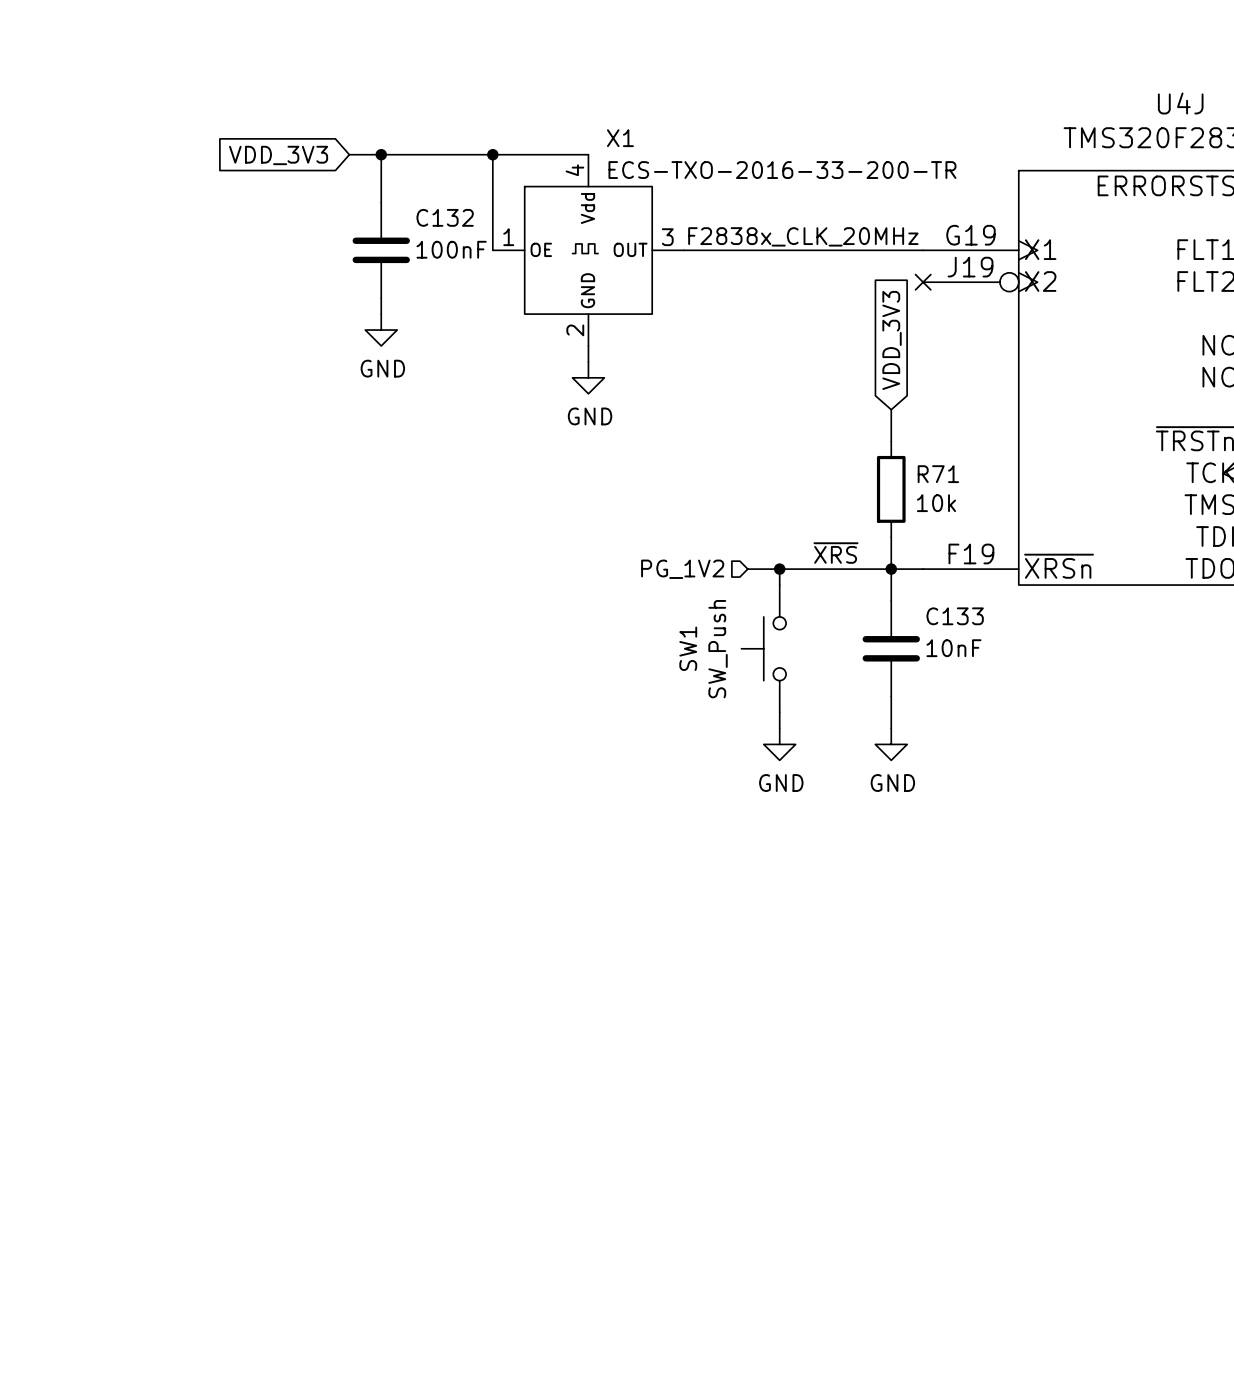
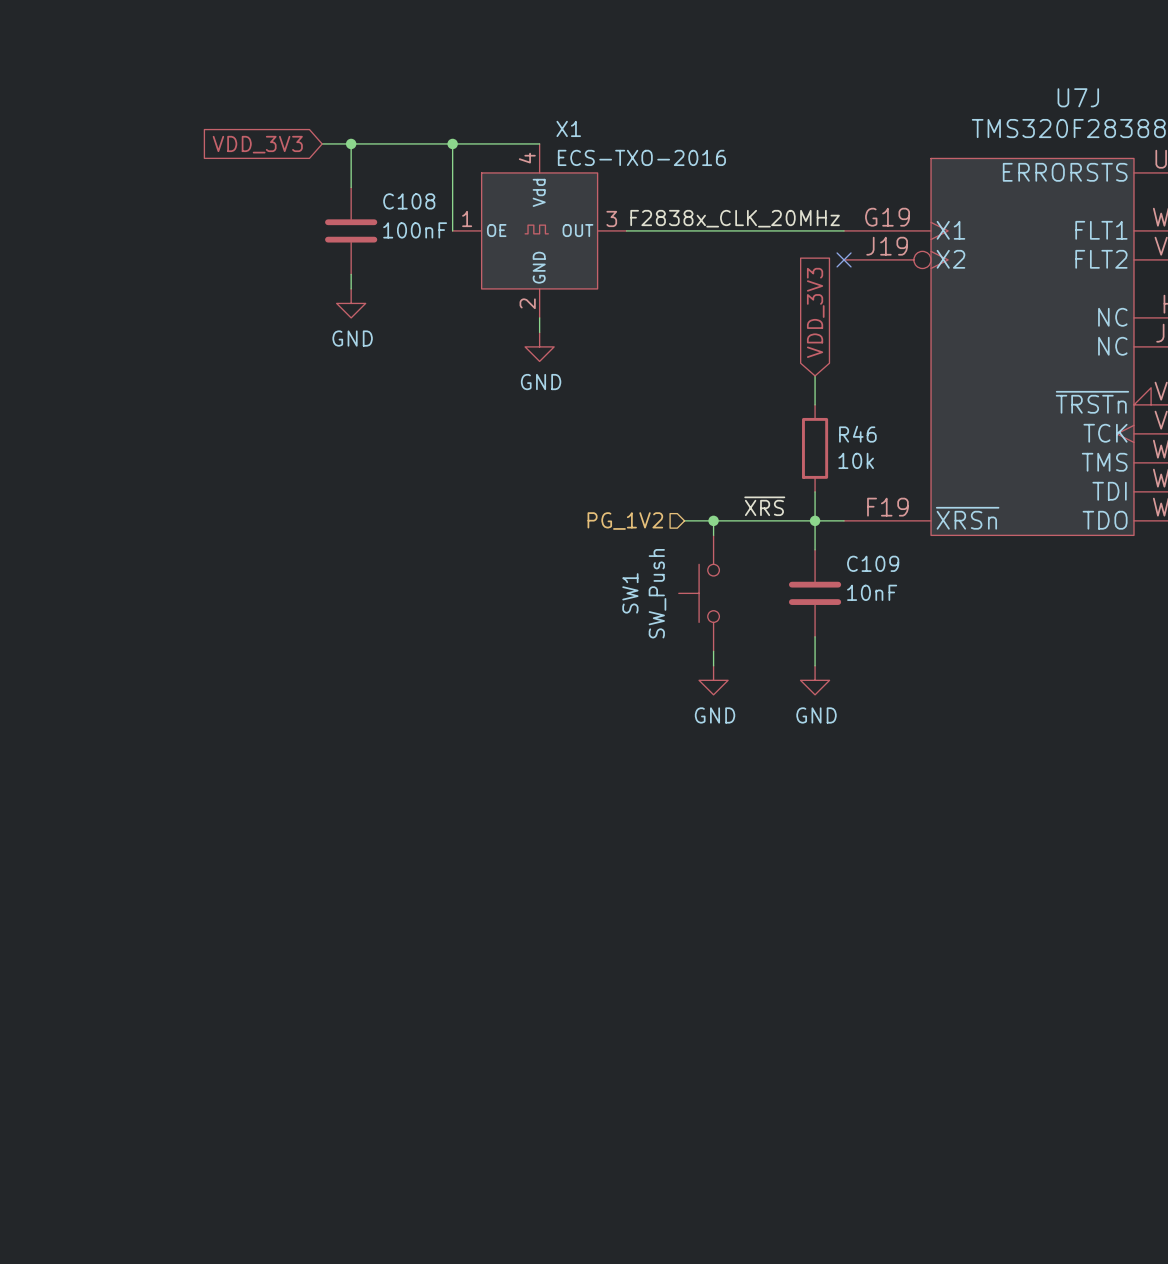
U4J name: U4J (1180, 103) -> U7J (1078, 97)
X1 value: ECS-TXO-2016-33-200-TR (782, 170) -> ECS-TXO-2016 (641, 157)
C132 name: C132 (445, 217) -> C108 (409, 201)
R71 name: R71 (938, 474) -> R46 (857, 434)
C133 name: C133 (955, 616) -> C109 (873, 563)

